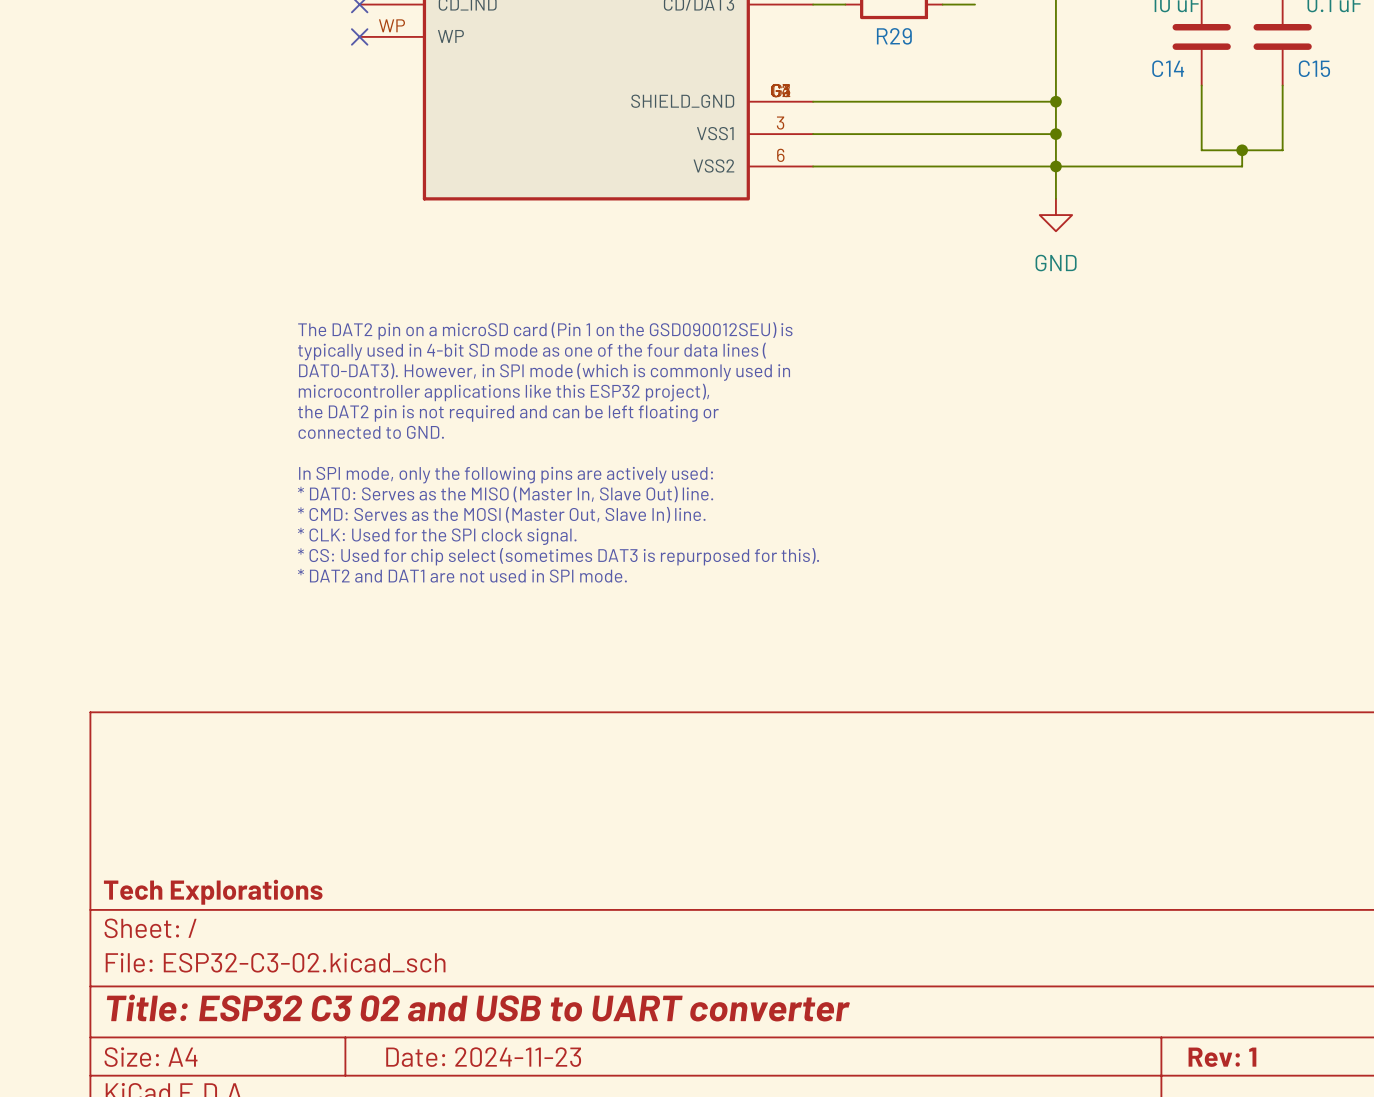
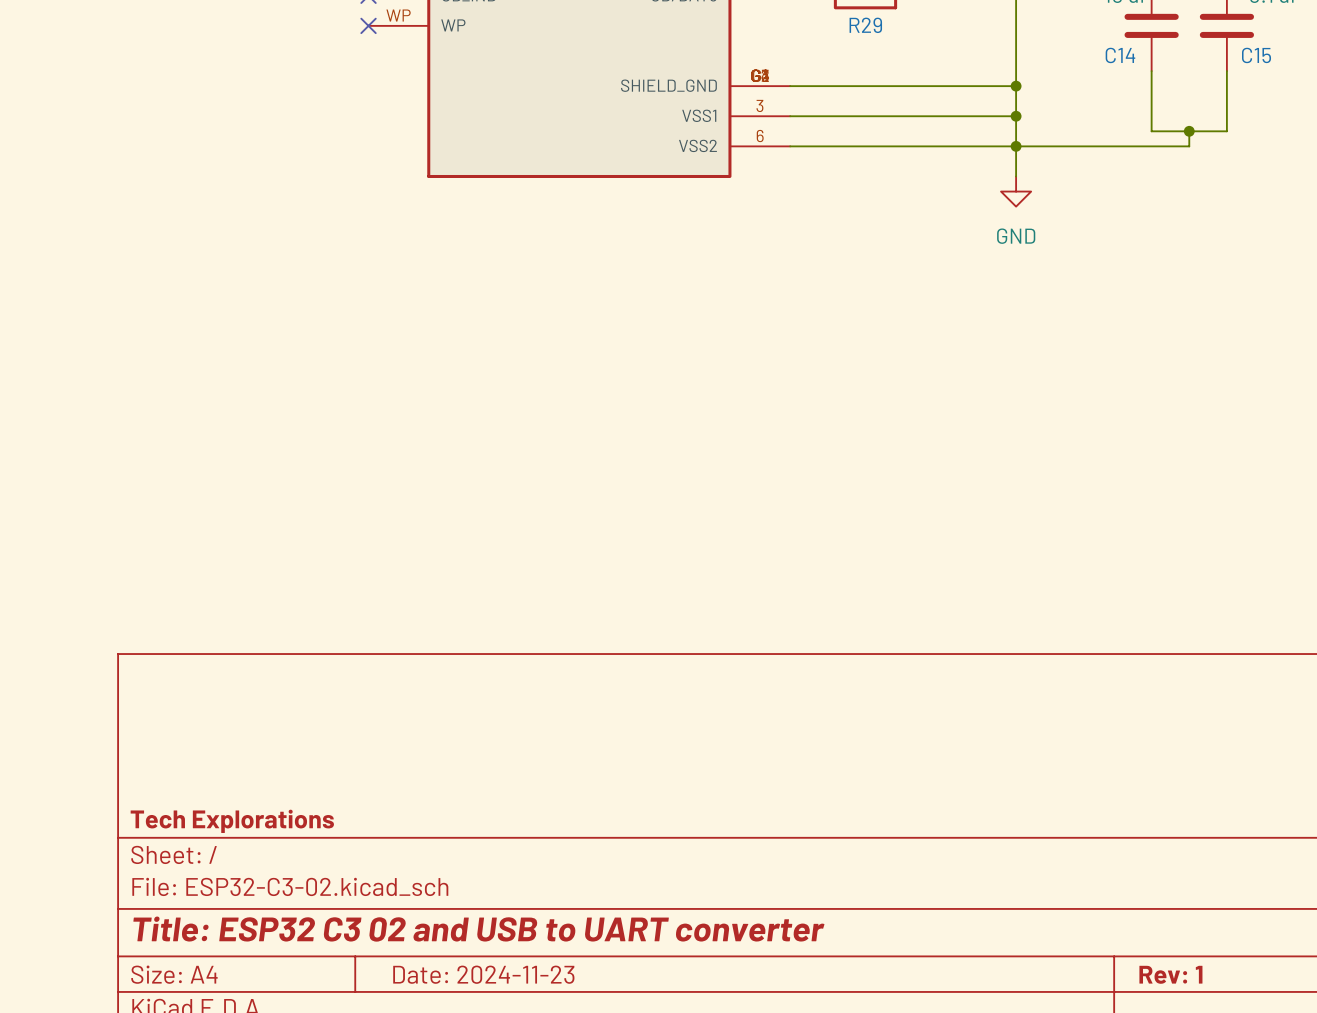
text: The DAT2 pin on a microSD card (Pin 1 on the GSD090012SEU) is (545, 330) -> none
text: typically used in 4-bit SD mode as one of the four data lines ( (532, 351) -> none
text: DAT0-DAT3). However, in SPI mode (which is commonly used in (544, 372) -> none
text: microcontroller applications like this ESP32 project), (503, 392) -> none
text: the DAT2 pin is not required and can be left floating or (508, 413) -> none
text: connected to GND. (371, 432) -> none
text: In SPI mode, only the following pins are actively used: (506, 475) -> none
text: * DAT0: Serves as the MISO (Master In, Slave Out) line. (505, 494) -> none
text: * CMD: Serves as the MOSI (Master Out, Slave In) line. (501, 514) -> none
text: * CLK: Used for the SPI clock signal. (437, 536) -> none
text: * CS: Used for chip select (sometimes DAT3 is repurposed for this). (558, 556) -> none
text: * DAT2 and DAT1 are not used in SPI mode. (462, 575) -> none

